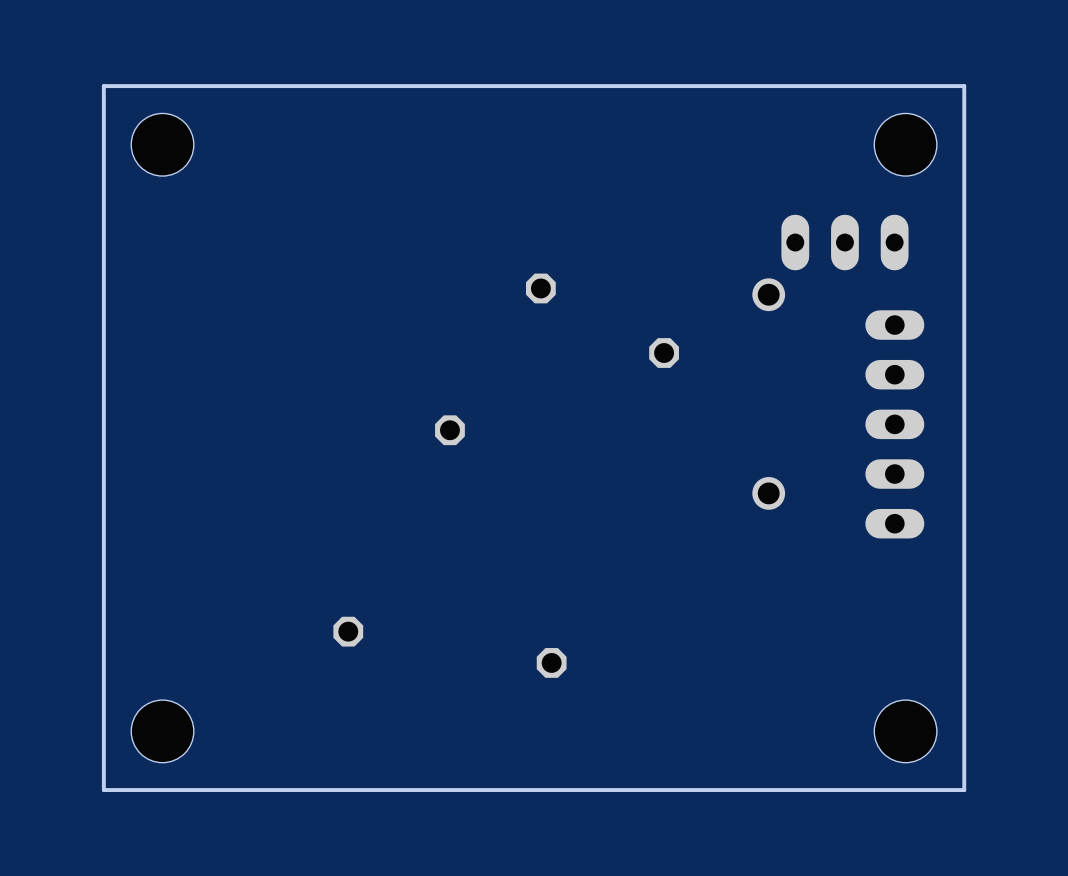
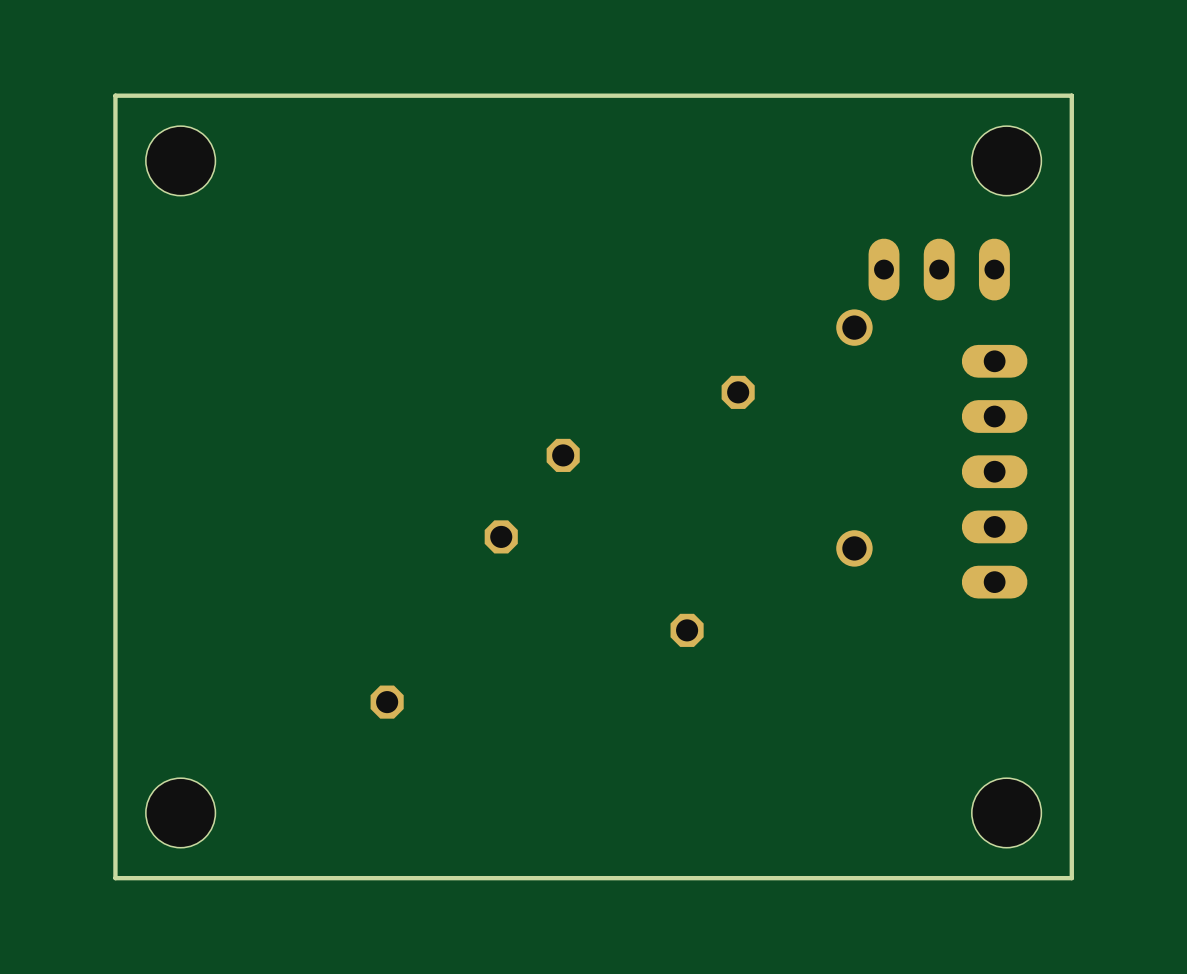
part: (540, 288) -> none
part: none -> (563, 455)
part: (449, 430) -> none
part: none -> (501, 536)
part: none -> (687, 630)
part: (551, 662) -> none

